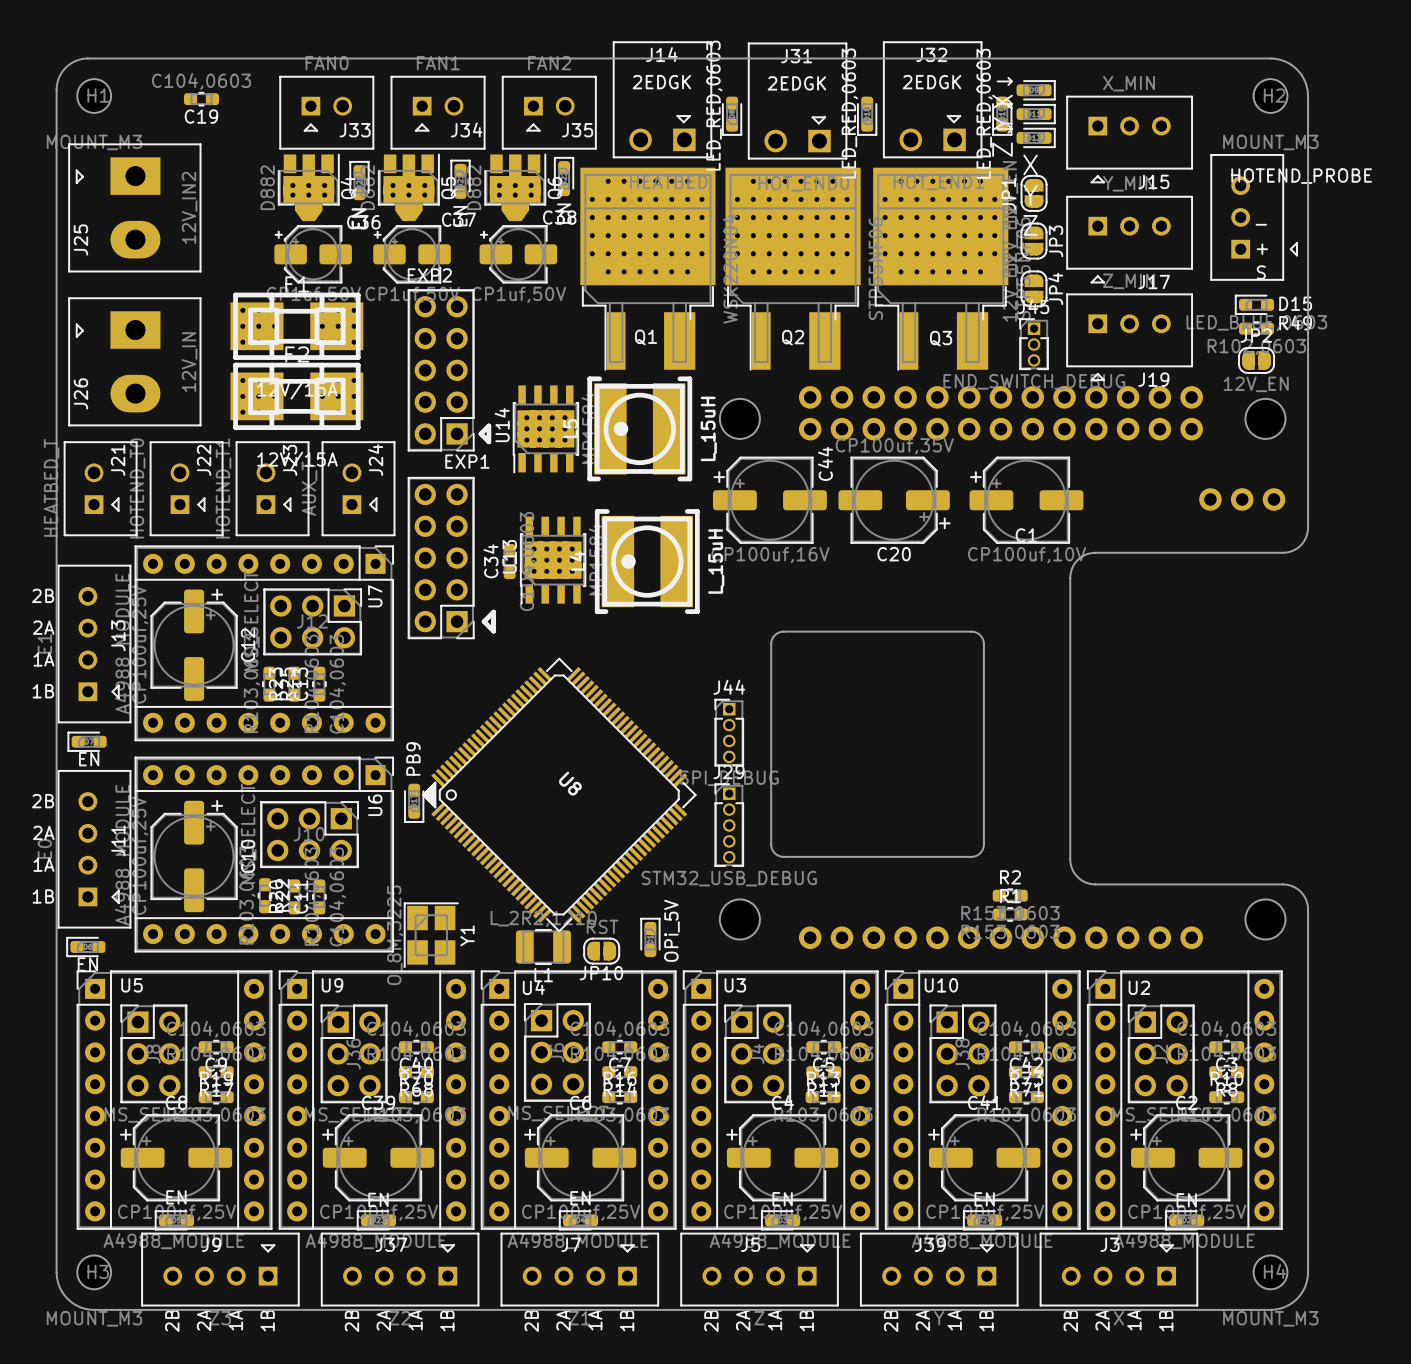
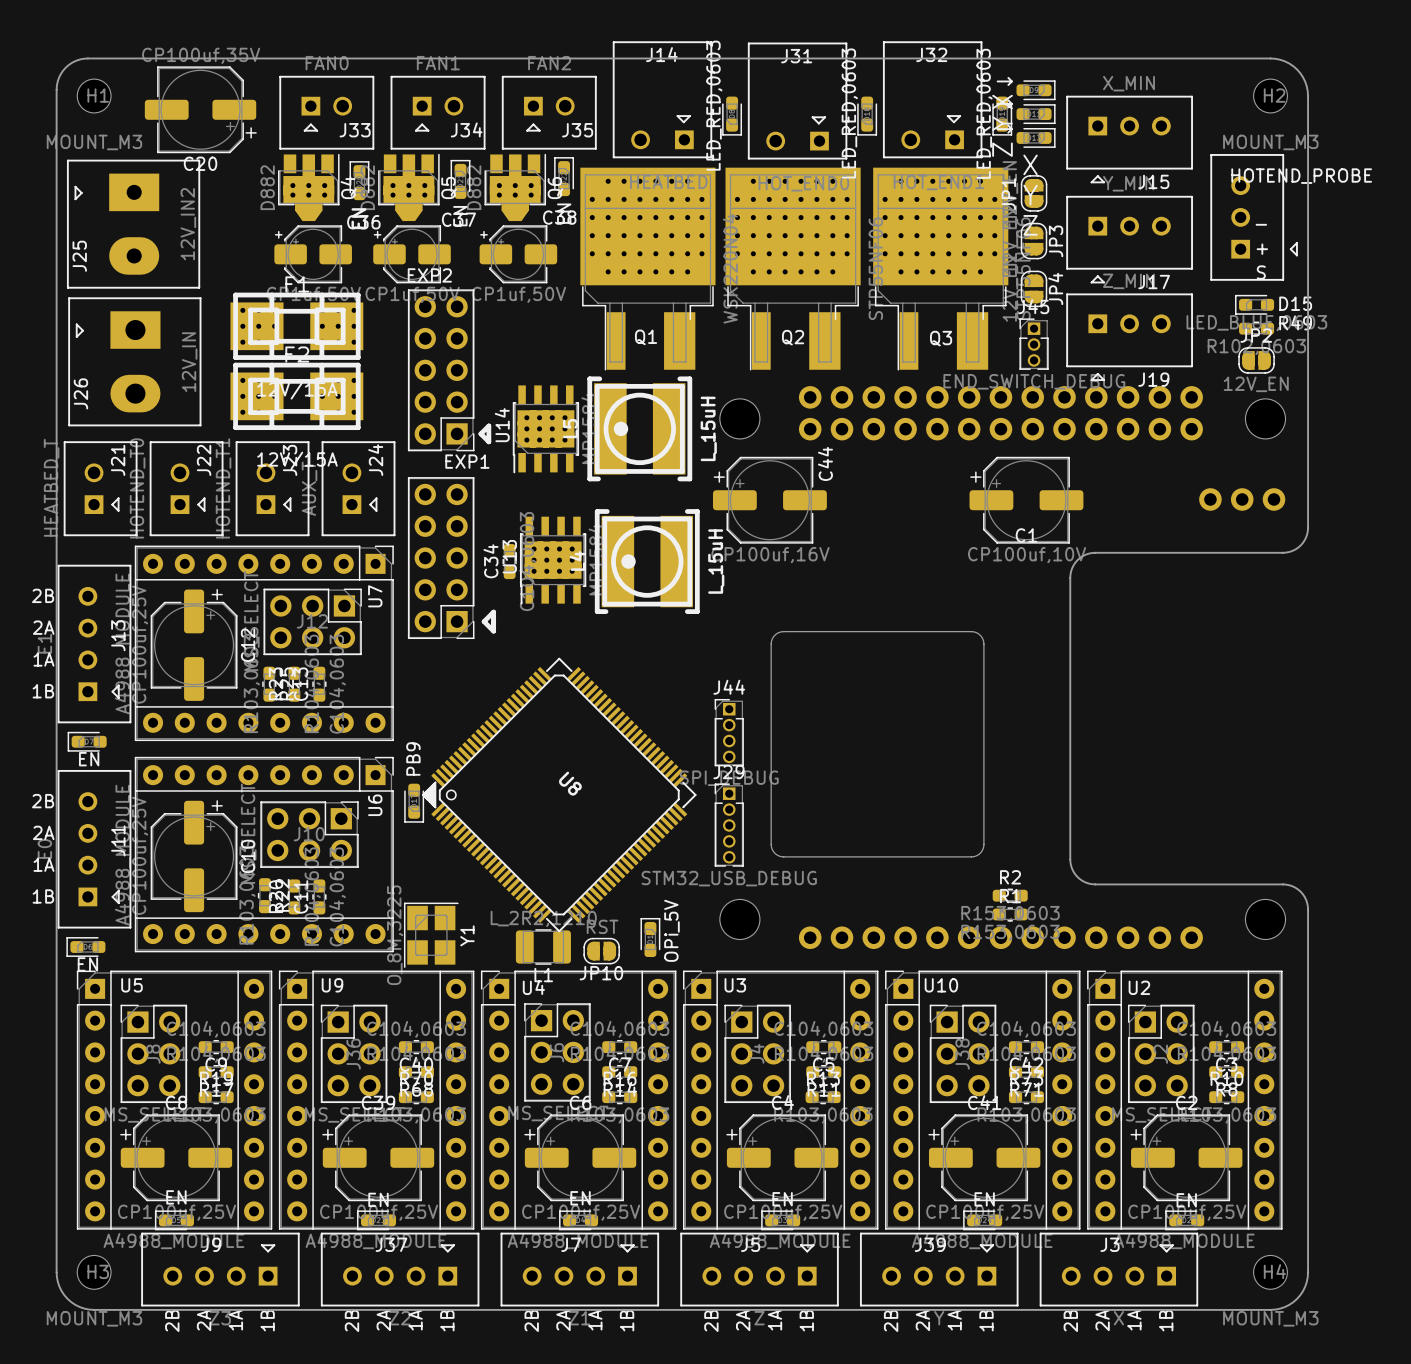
J14 footprint: [612, 41, 713, 159] -> [612, 41, 713, 159]
J32 footprint: [882, 41, 983, 159] -> [882, 41, 983, 159]
J31 footprint: [747, 42, 848, 160] -> [747, 42, 848, 160]
C19: C104,0603 (201, 99) -> none
J25 footprint: [68, 143, 202, 273] -> [66, 159, 201, 289]
C20 footprint: [838, 456, 951, 544] -> [144, 66, 257, 154]

